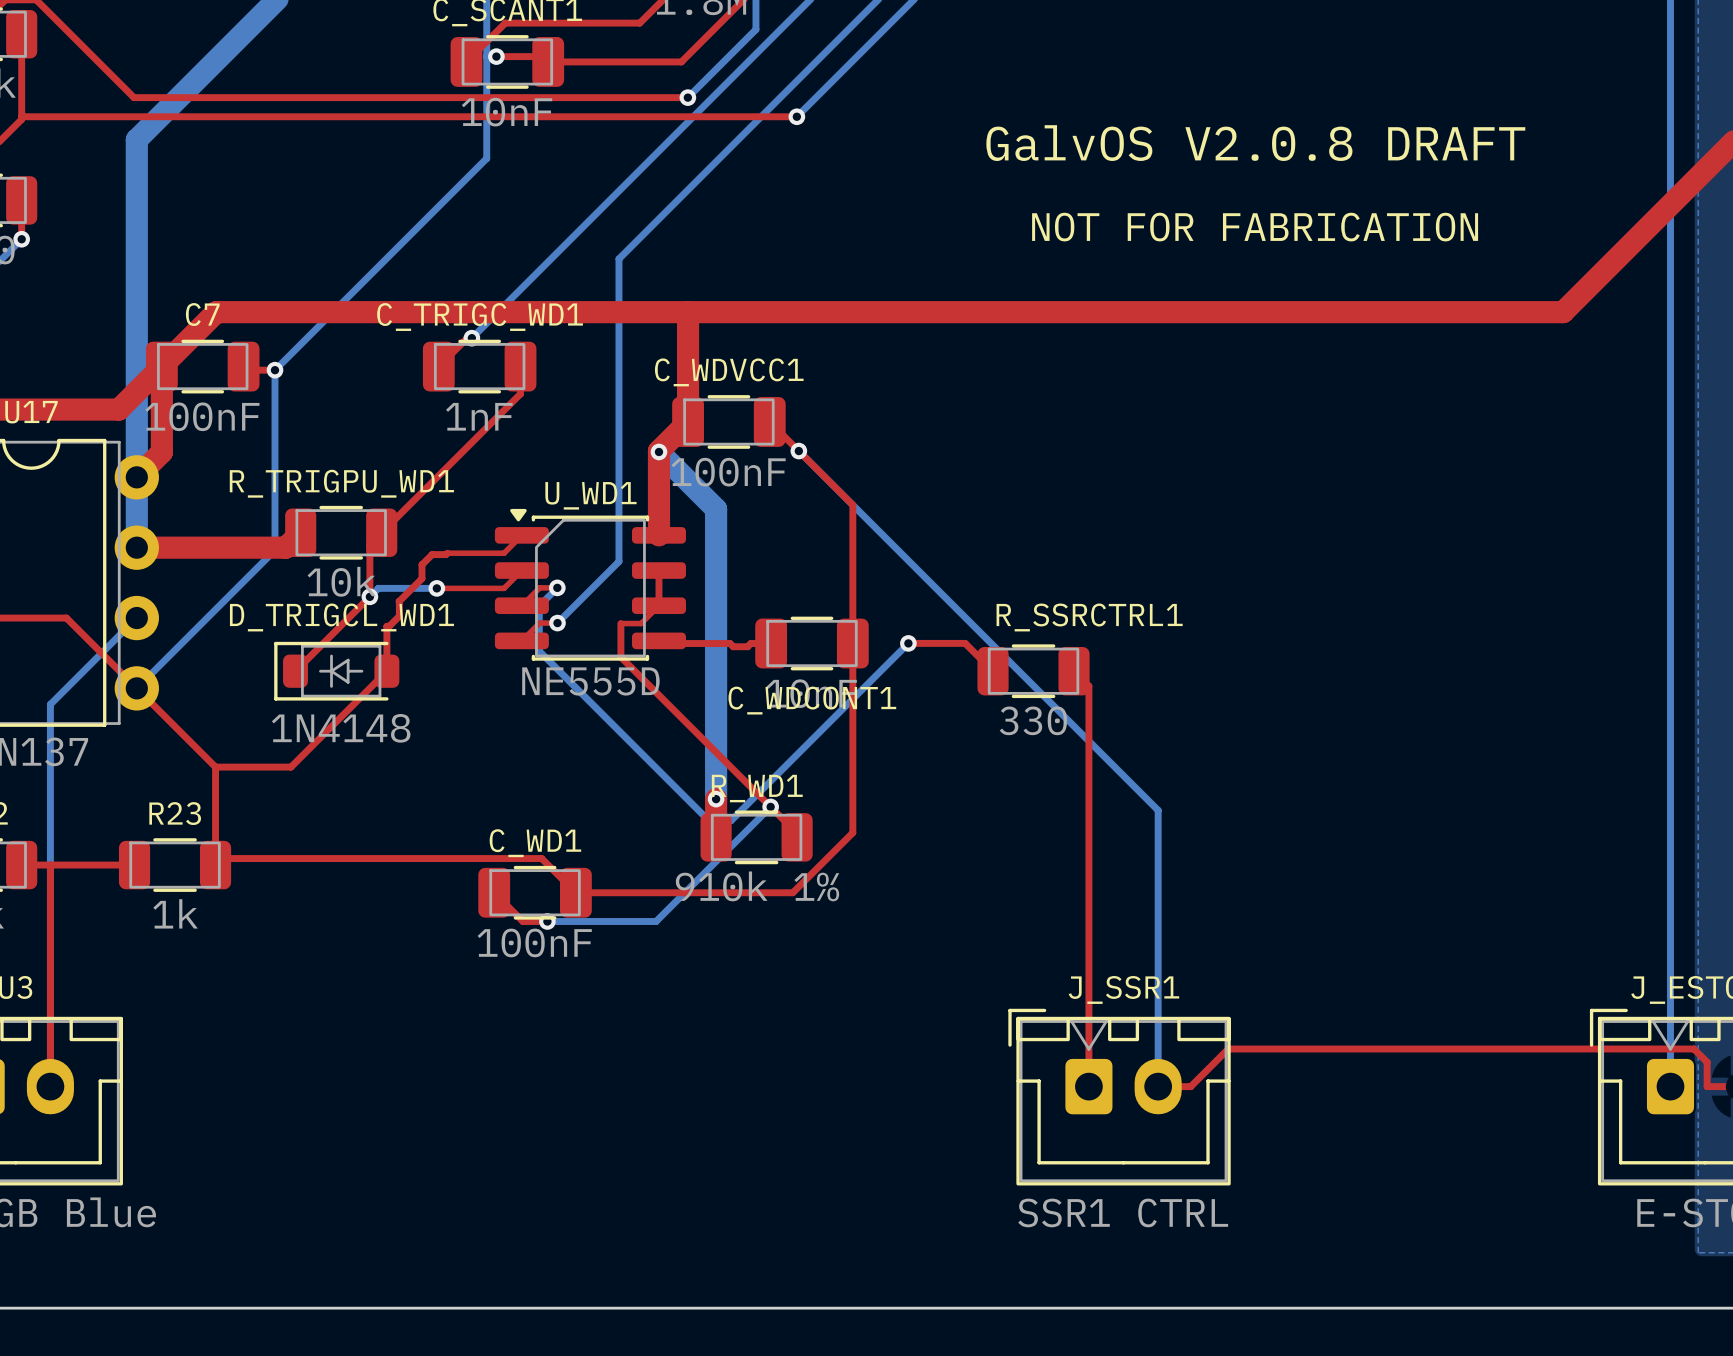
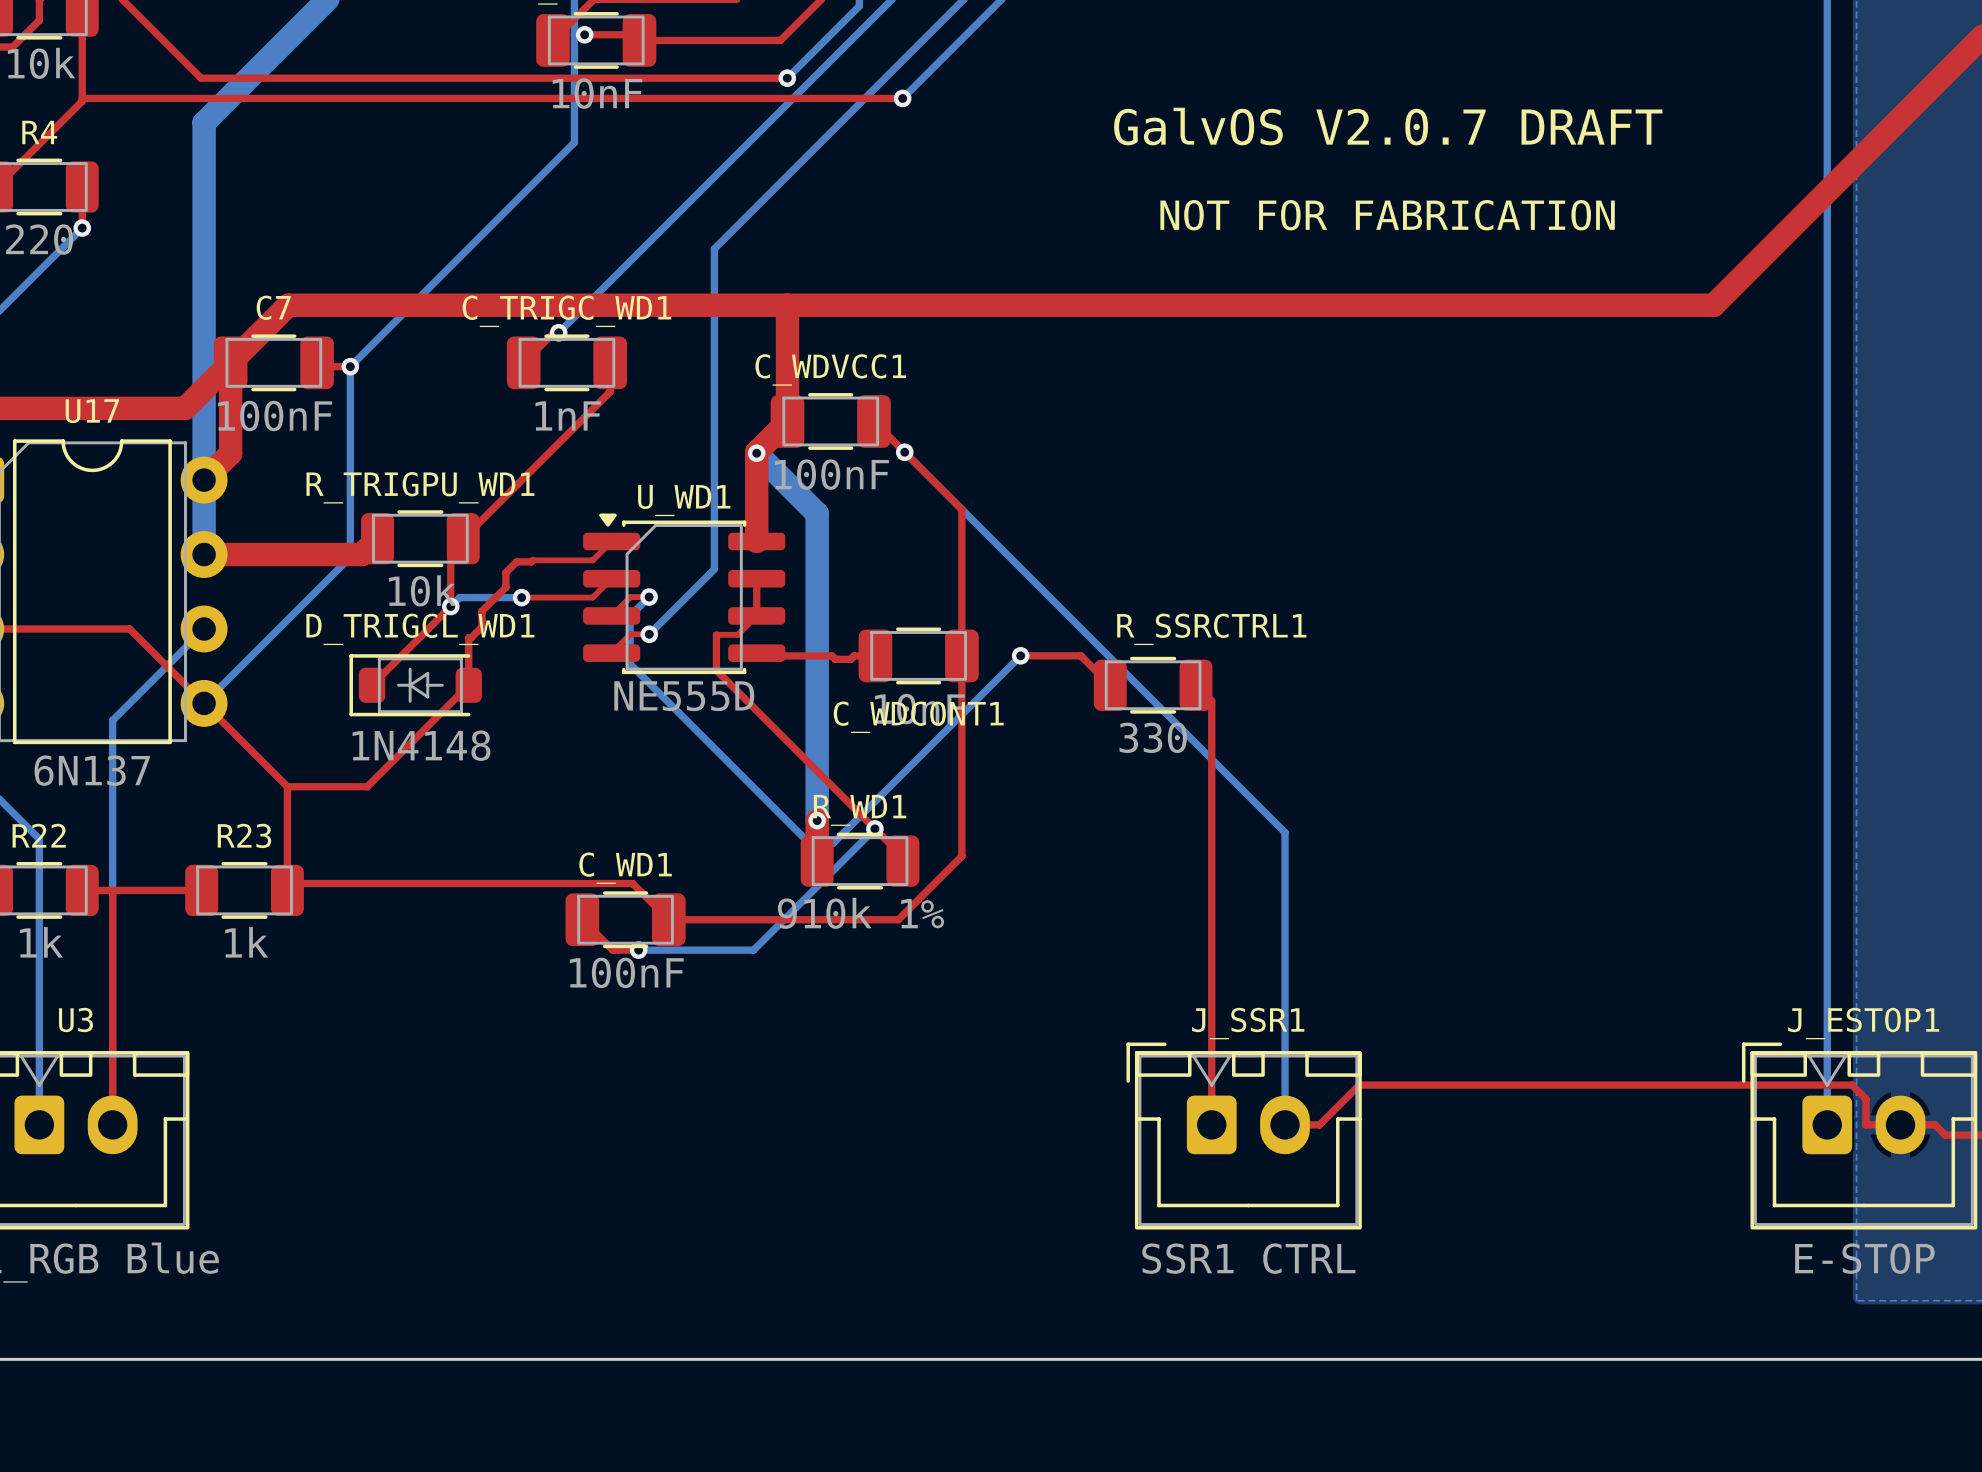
text: GalvOS V2.0.8 DRAFT (1255, 143) -> GalvOS V2.0.7 DRAFT (1388, 126)

